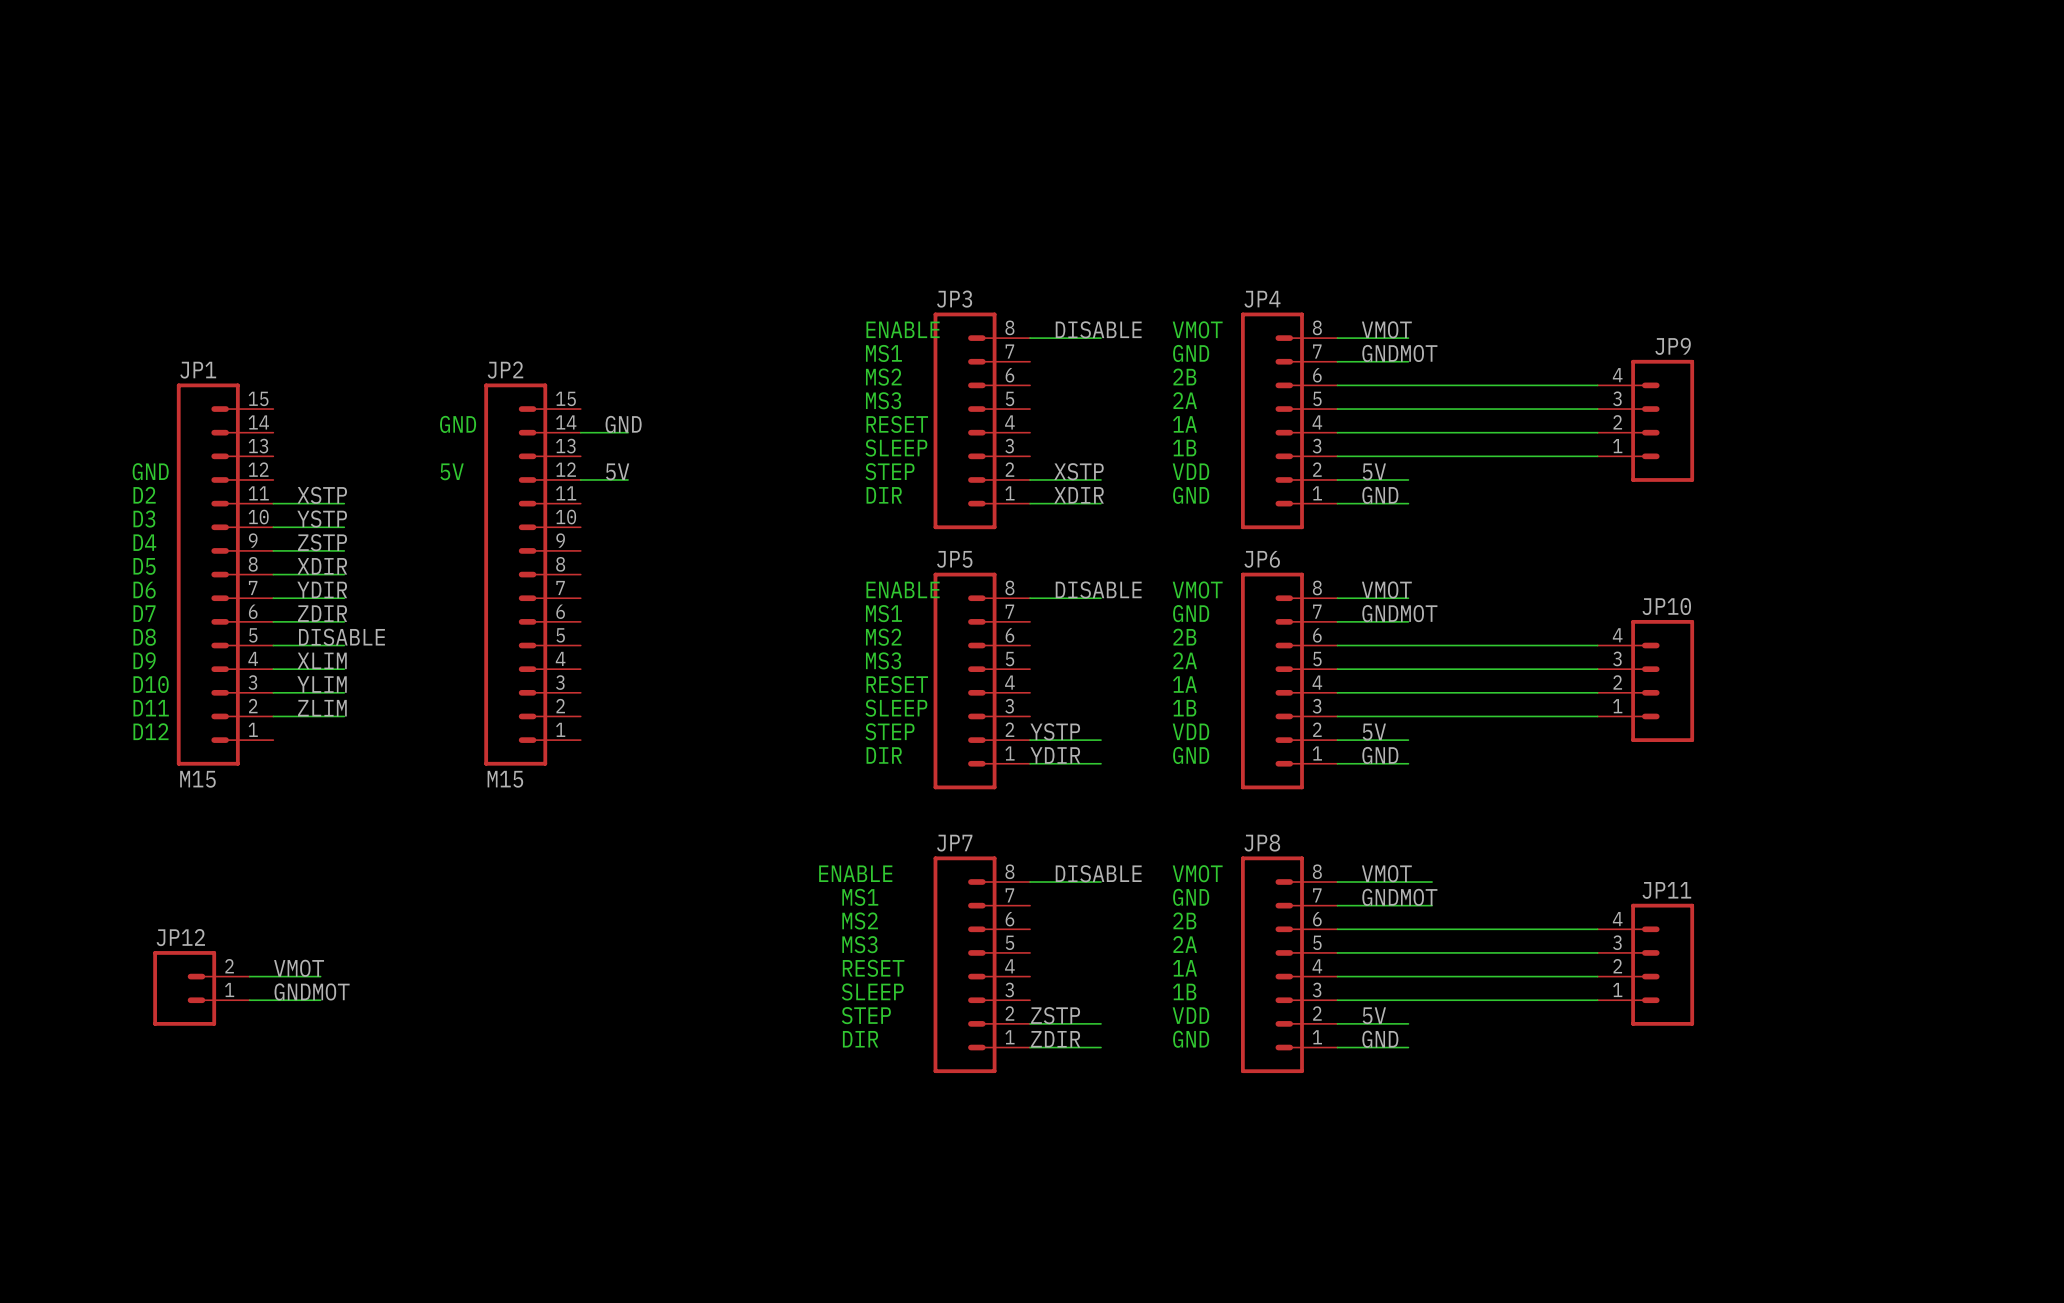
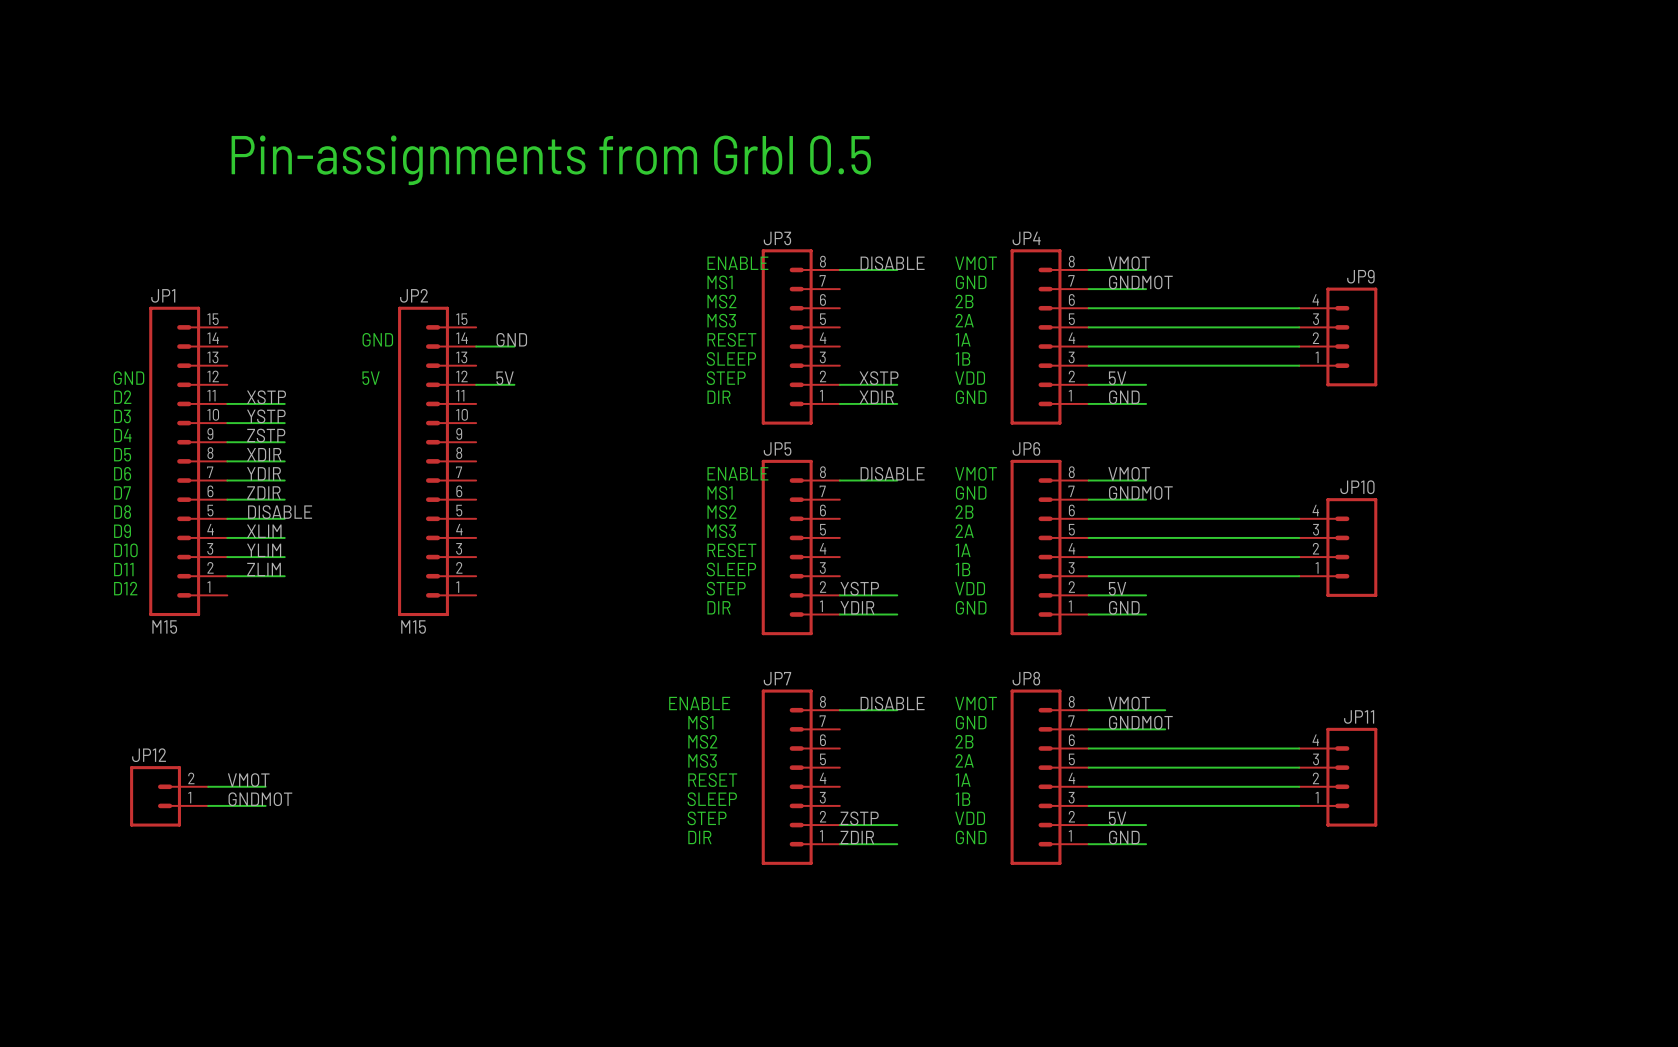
text: none -> Pin-assignments from Grbl 0.5 (551, 160)

